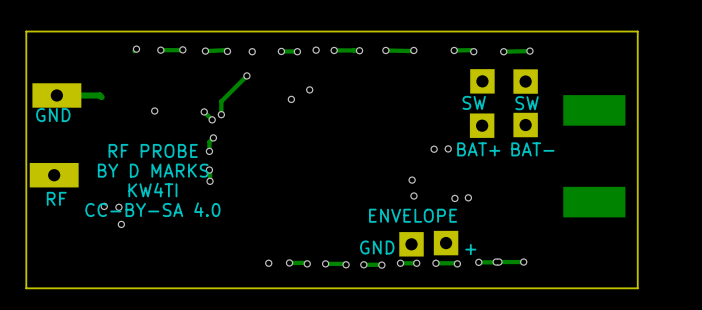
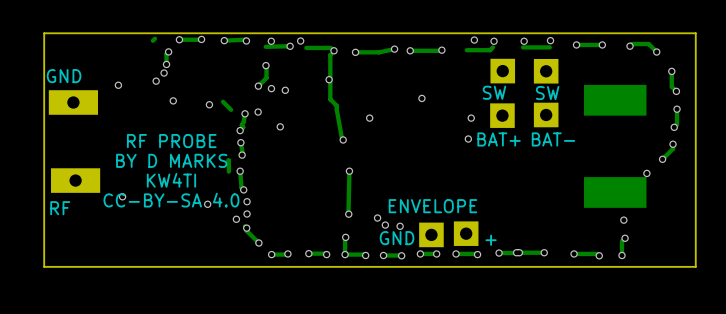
board edge: (26, 43) (26, 31) (637, 31) (637, 288) (26, 288) (26, 276) -> (44, 33) (695, 33) (695, 266) (44, 266)
via: (136, 49) -> none
via: (316, 50) -> none
track: (334, 50) (359, 50) -> none
via: (334, 50) -> none
via: (359, 50) -> none
via: (385, 50) -> none
track: (413, 50) (385, 50) -> none
via: (413, 50) -> none
track: (454, 50) (473, 51) -> none
track: (281, 51) (297, 51) -> none
via: (297, 51) -> none
track: (529, 51) (503, 51) -> none
via: none -> (576, 44)
track: none -> (602, 44) (576, 44)
via: none -> (602, 44)
track: none -> (290, 46) (265, 46)
via: none -> (290, 46)
track: none -> (630, 46) (632, 44) (648, 44) (656, 52)
via: none -> (630, 46)
track: none -> (492, 47) (490, 50) (466, 50)
track: none -> (549, 47) (523, 47)
track: none -> (306, 47) (330, 47) (334, 50)
track: none -> (394, 49) (379, 52) (355, 52)
via: none -> (394, 49)
track: none -> (441, 50) (410, 50)
via: none -> (441, 50)
via: none -> (334, 50)
via: none -> (410, 50)
track: none -> (168, 51) (166, 53) (166, 64)
via: none -> (168, 51)
via: none -> (355, 52)
via: none -> (656, 52)
track: none -> (330, 54) (330, 99) (336, 105) (343, 139)
via: none -> (166, 64)
track: (246, 75) (221, 101) (221, 114) -> none
track: none -> (266, 66) (266, 78) (258, 86)
track: none -> (671, 71) (671, 86) (676, 91)
via: none -> (671, 71)
via: none -> (164, 73)
via: none -> (156, 81)
track: (56, 93) (56, 95) (99, 95) (101, 97) -> none
part position: (56, 95) -> (73, 102)
via: none -> (118, 85)
via: none -> (258, 86)
via: none -> (271, 88)
via: (291, 99) -> none
via: none -> (285, 90)
via: none -> (676, 91)
via: none -> (421, 98)
via: (204, 111) -> none
via: none -> (209, 104)
via: (221, 114) -> none
text position: GND (53, 115) -> GND (64, 76)
via: (212, 119) -> none
track: none -> (677, 109) (677, 124) (674, 127)
via: none -> (677, 109)
via: none -> (258, 112)
track: none -> (245, 113) (241, 125) (243, 127) (240, 130)
via: none -> (245, 113)
via: none -> (369, 118)
via: none -> (471, 118)
via: none -> (280, 126)
track: (213, 137) (209, 141) (209, 151) -> none
via: (213, 137) -> none
via: none -> (674, 127)
via: none -> (240, 130)
via: none -> (343, 139)
via: (434, 149) -> none
via: (209, 151) -> none
track: none -> (240, 142) (242, 155)
via: none -> (240, 142)
track: none -> (673, 144) (673, 148) (662, 159)
via: none -> (673, 144)
via: none -> (242, 155)
via: none -> (662, 159)
via: (209, 170) -> none
part position: (54, 175) -> (75, 180)
track: none -> (240, 171) (241, 187) (243, 189)
via: none -> (240, 171)
track: none -> (349, 171) (348, 214)
via: none -> (349, 171)
via: (412, 180) -> none
via: (210, 181) -> none
via: none -> (646, 173)
via: (413, 196) -> none
via: (468, 197) -> none
text position: RF (56, 198) -> RF (60, 208)
via: (454, 198) -> none
via: none -> (243, 189)
via: (118, 207) -> none
via: none -> (247, 201)
via: none -> (207, 204)
via: none -> (247, 214)
via: none -> (348, 214)
via: (121, 224) -> none
via: none -> (377, 218)
via: none -> (236, 219)
via: none -> (623, 220)
via: none -> (385, 225)
track: none -> (244, 226) (246, 230) (258, 243)
via: none -> (400, 226)
via: none -> (246, 228)
track: none -> (345, 237) (345, 254)
via: none -> (345, 237)
track: none -> (625, 238) (622, 241) (622, 255)
via: none -> (625, 238)
via: none -> (258, 243)
via: none -> (271, 254)
track: none -> (287, 254) (271, 254)
track: none -> (574, 253) (597, 253) (599, 255)
via: none -> (574, 253)
via: none -> (622, 255)
via: none -> (599, 255)

